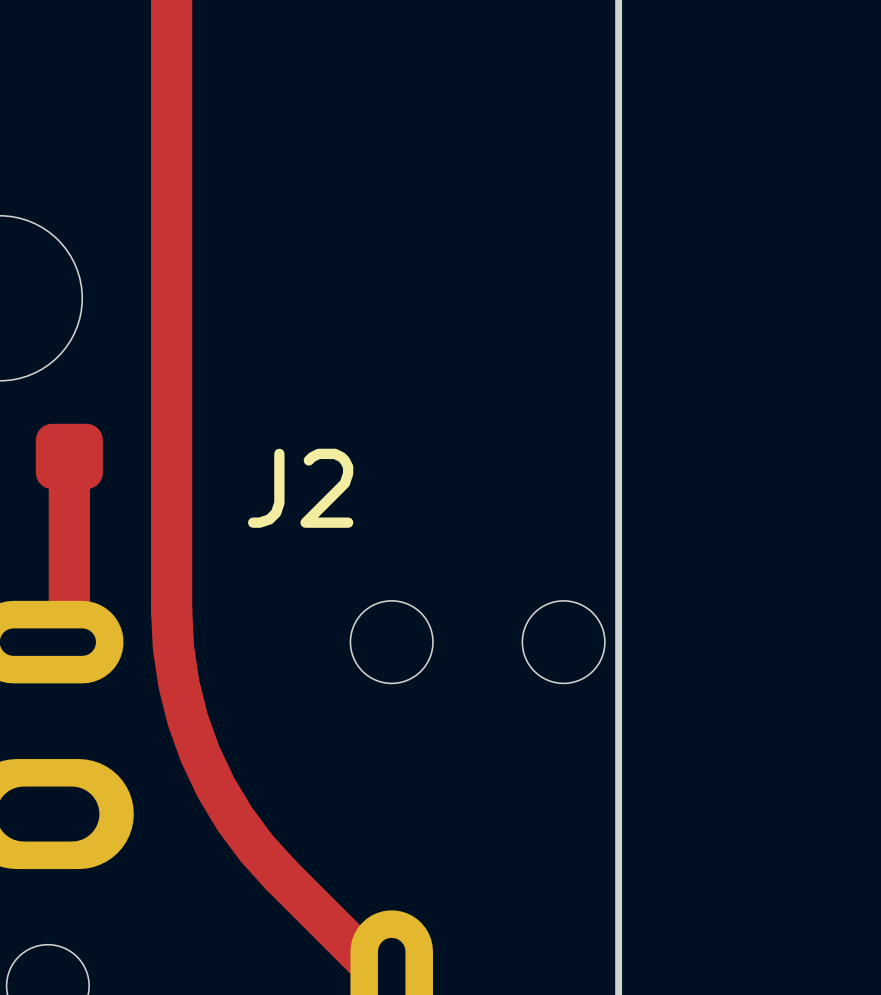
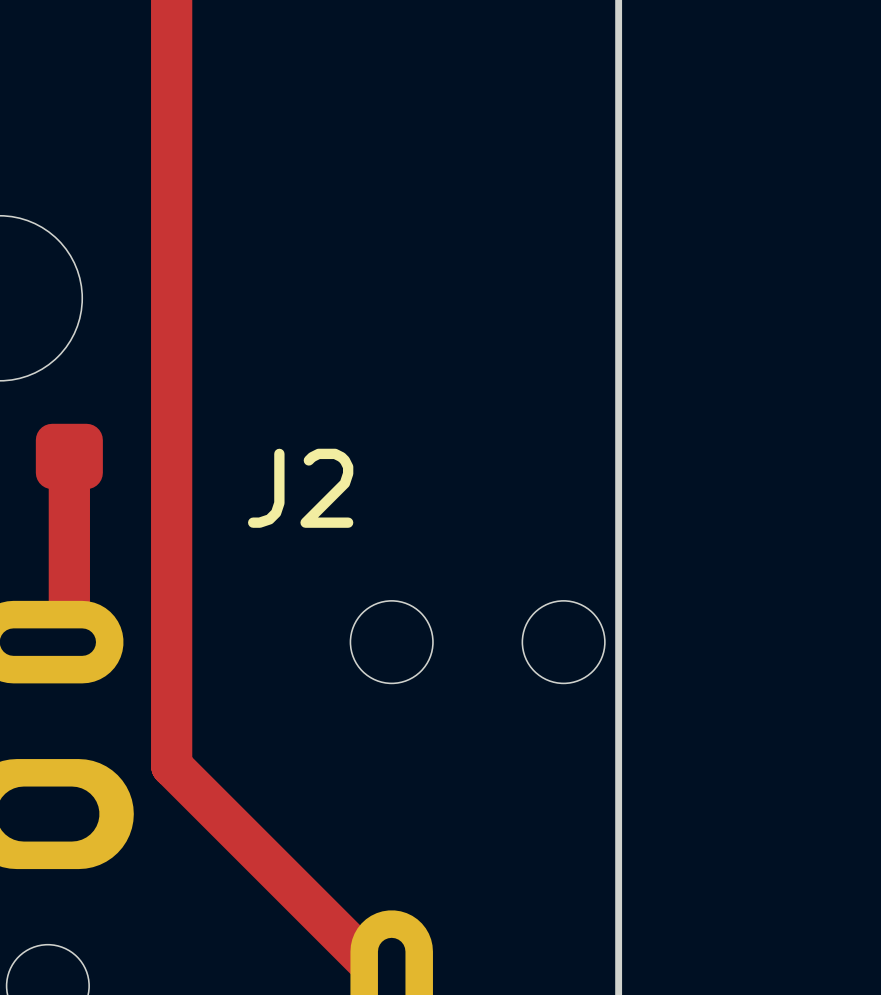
top track: (171, 610) (173, 647) (178, 683) (187, 719) (200, 754) (215, 787) (234, 818) (256, 848) (281, 875) -> (171, 610) (171, 765) (281, 875)

